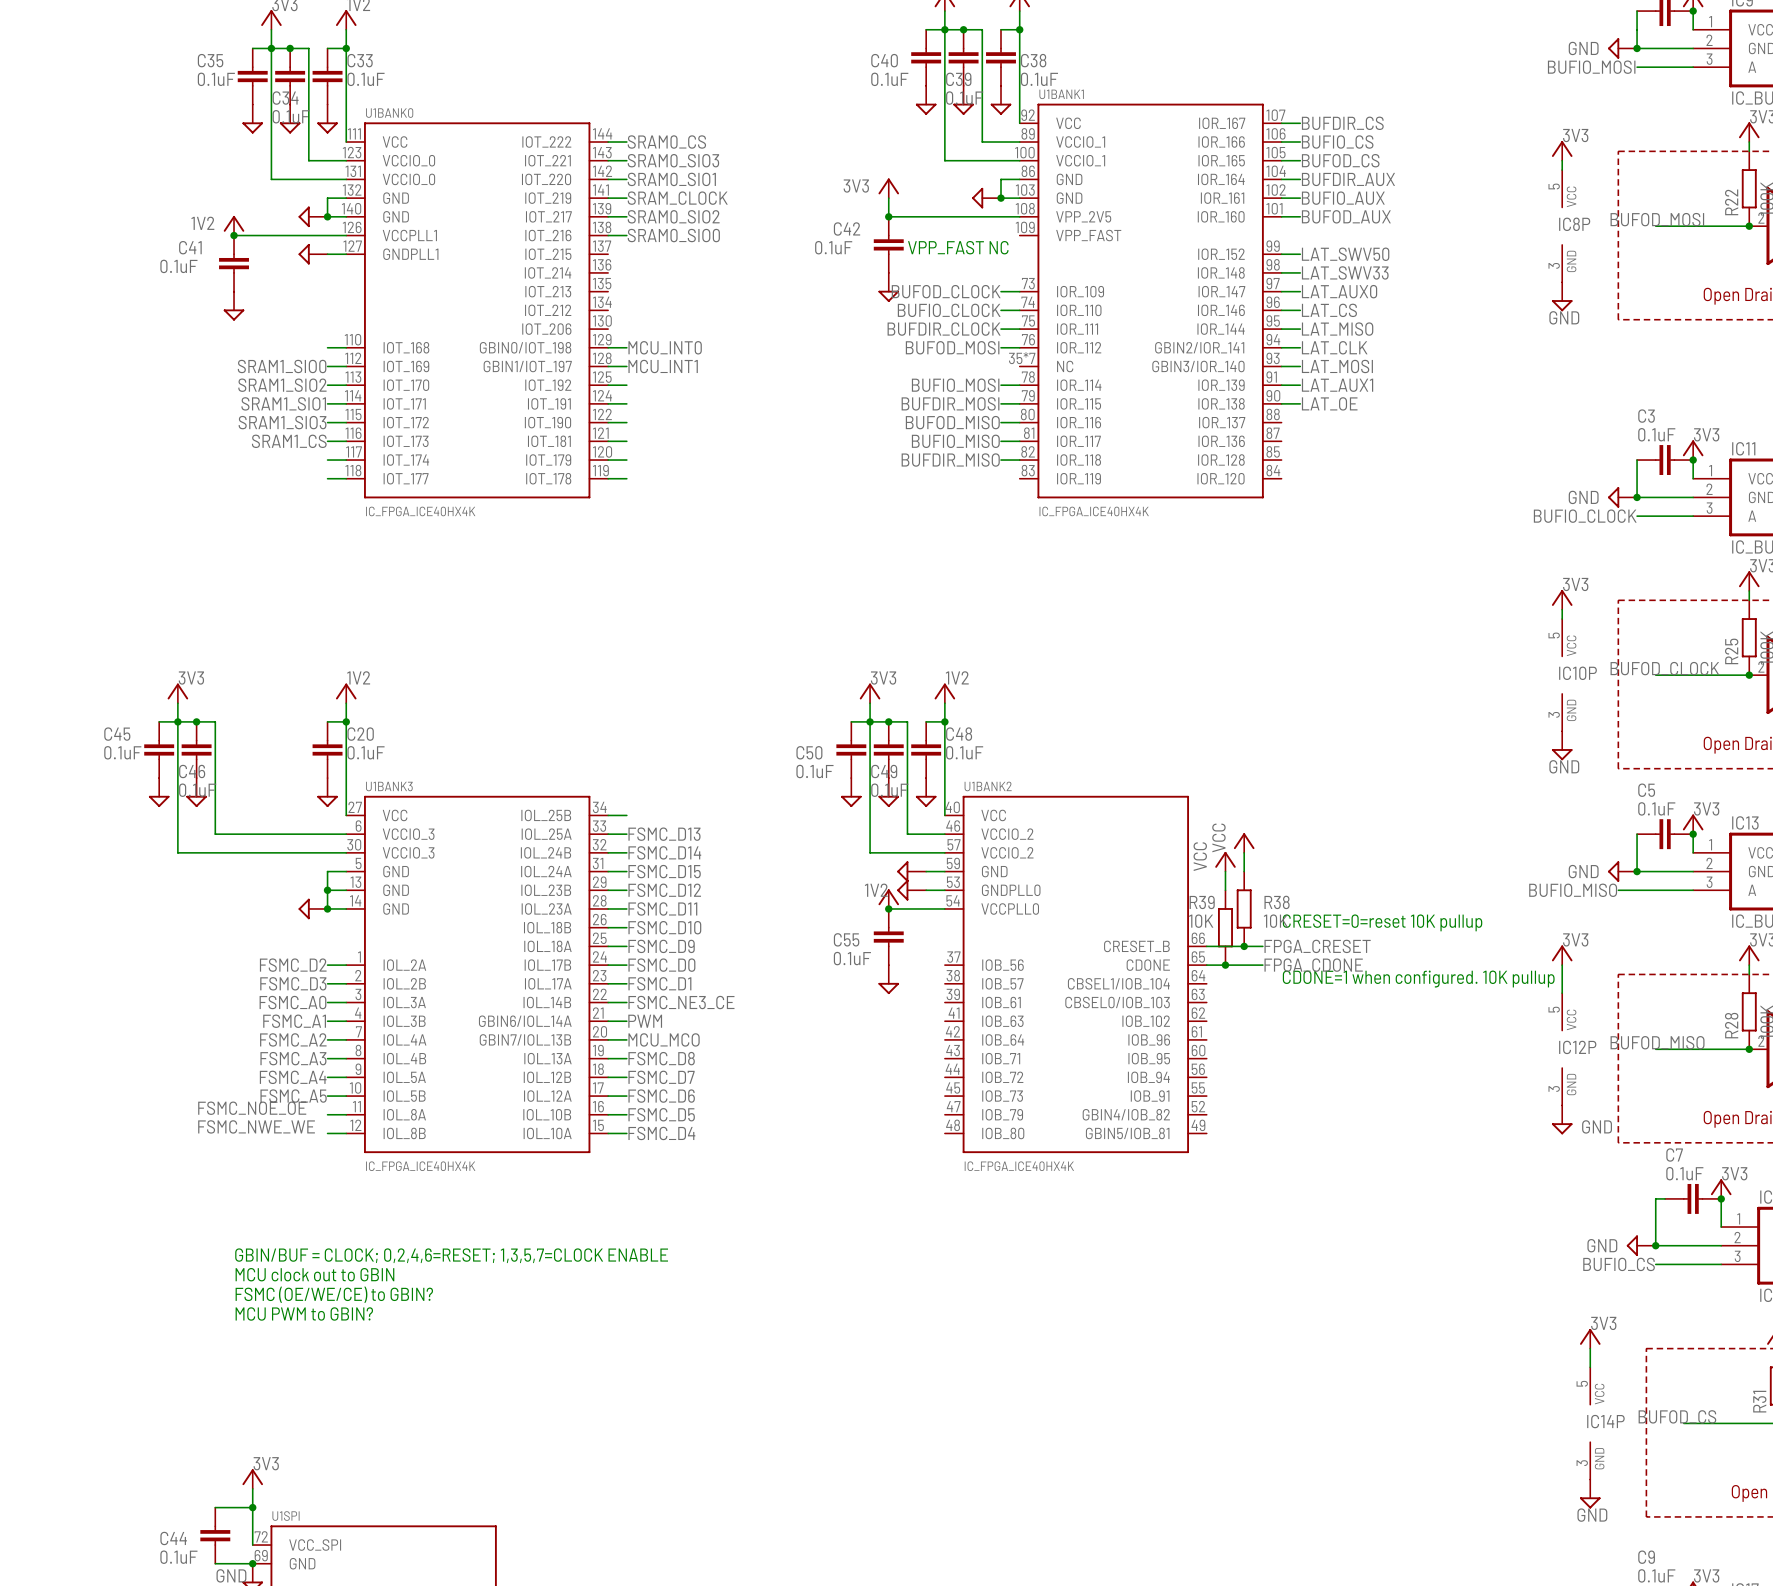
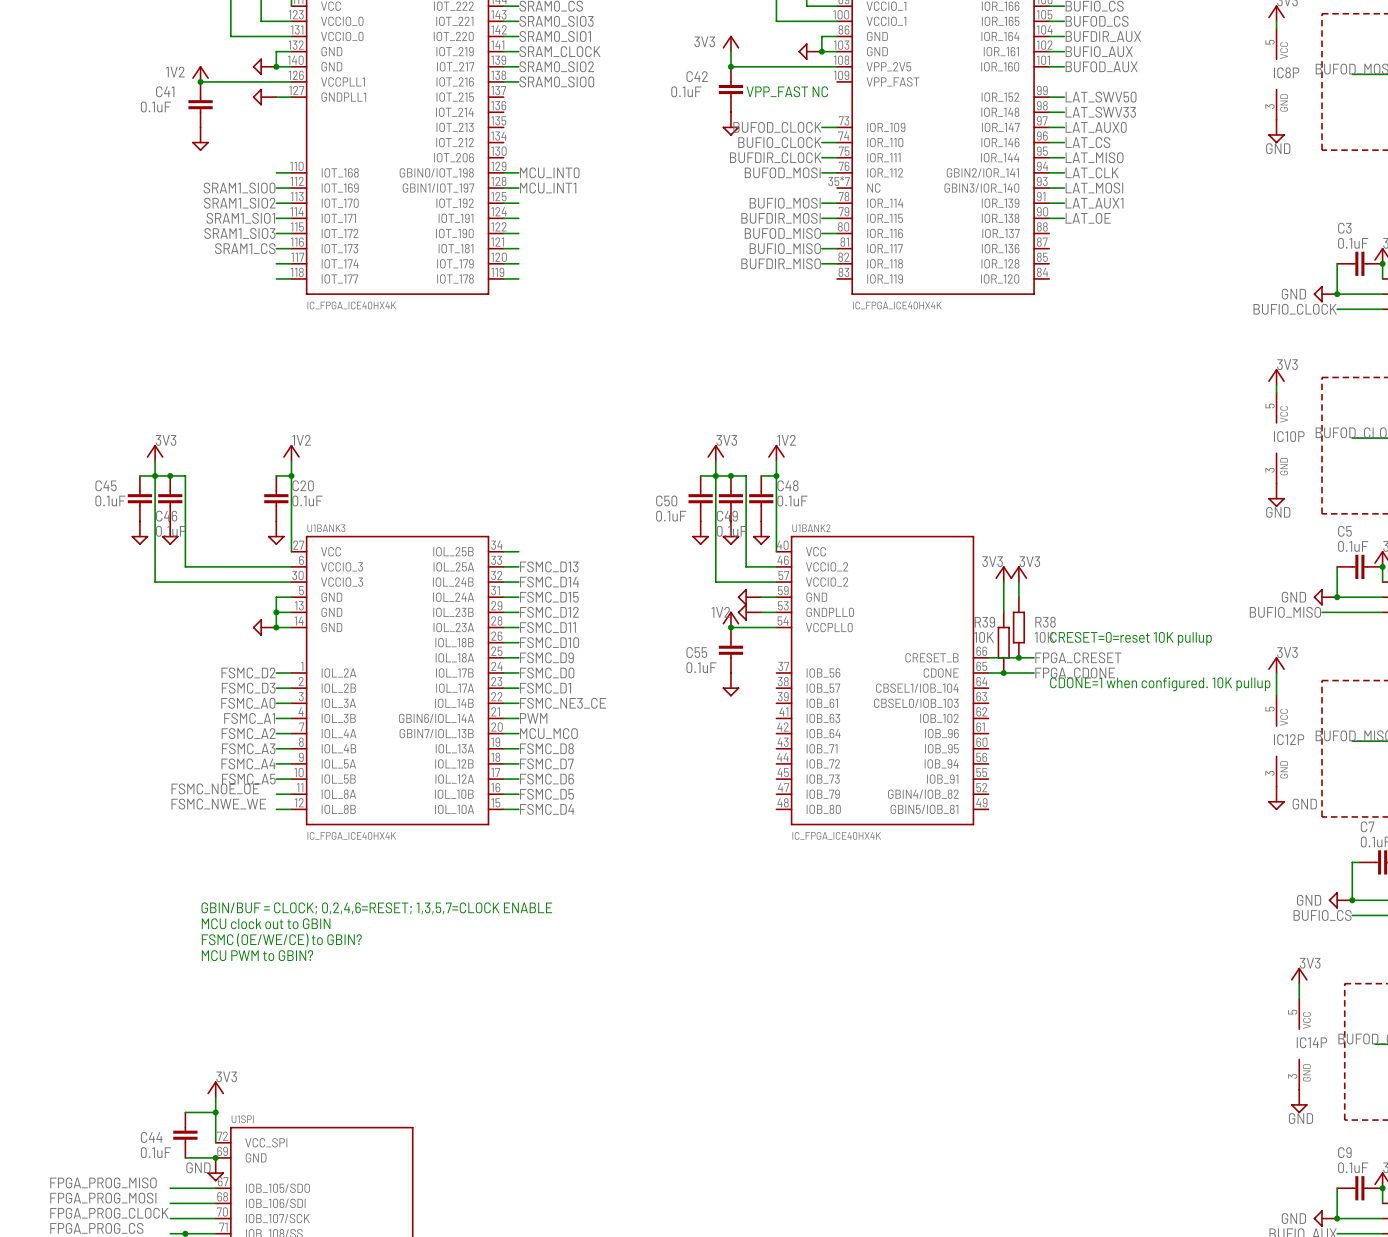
label: none -> 3V3 (992, 561)
label: none -> 3V3 (1029, 561)
power symbol text: VCC (1218, 837) -> none
power symbol: none -> (1003, 574)
power symbol: VCC (1225, 861) -> none

